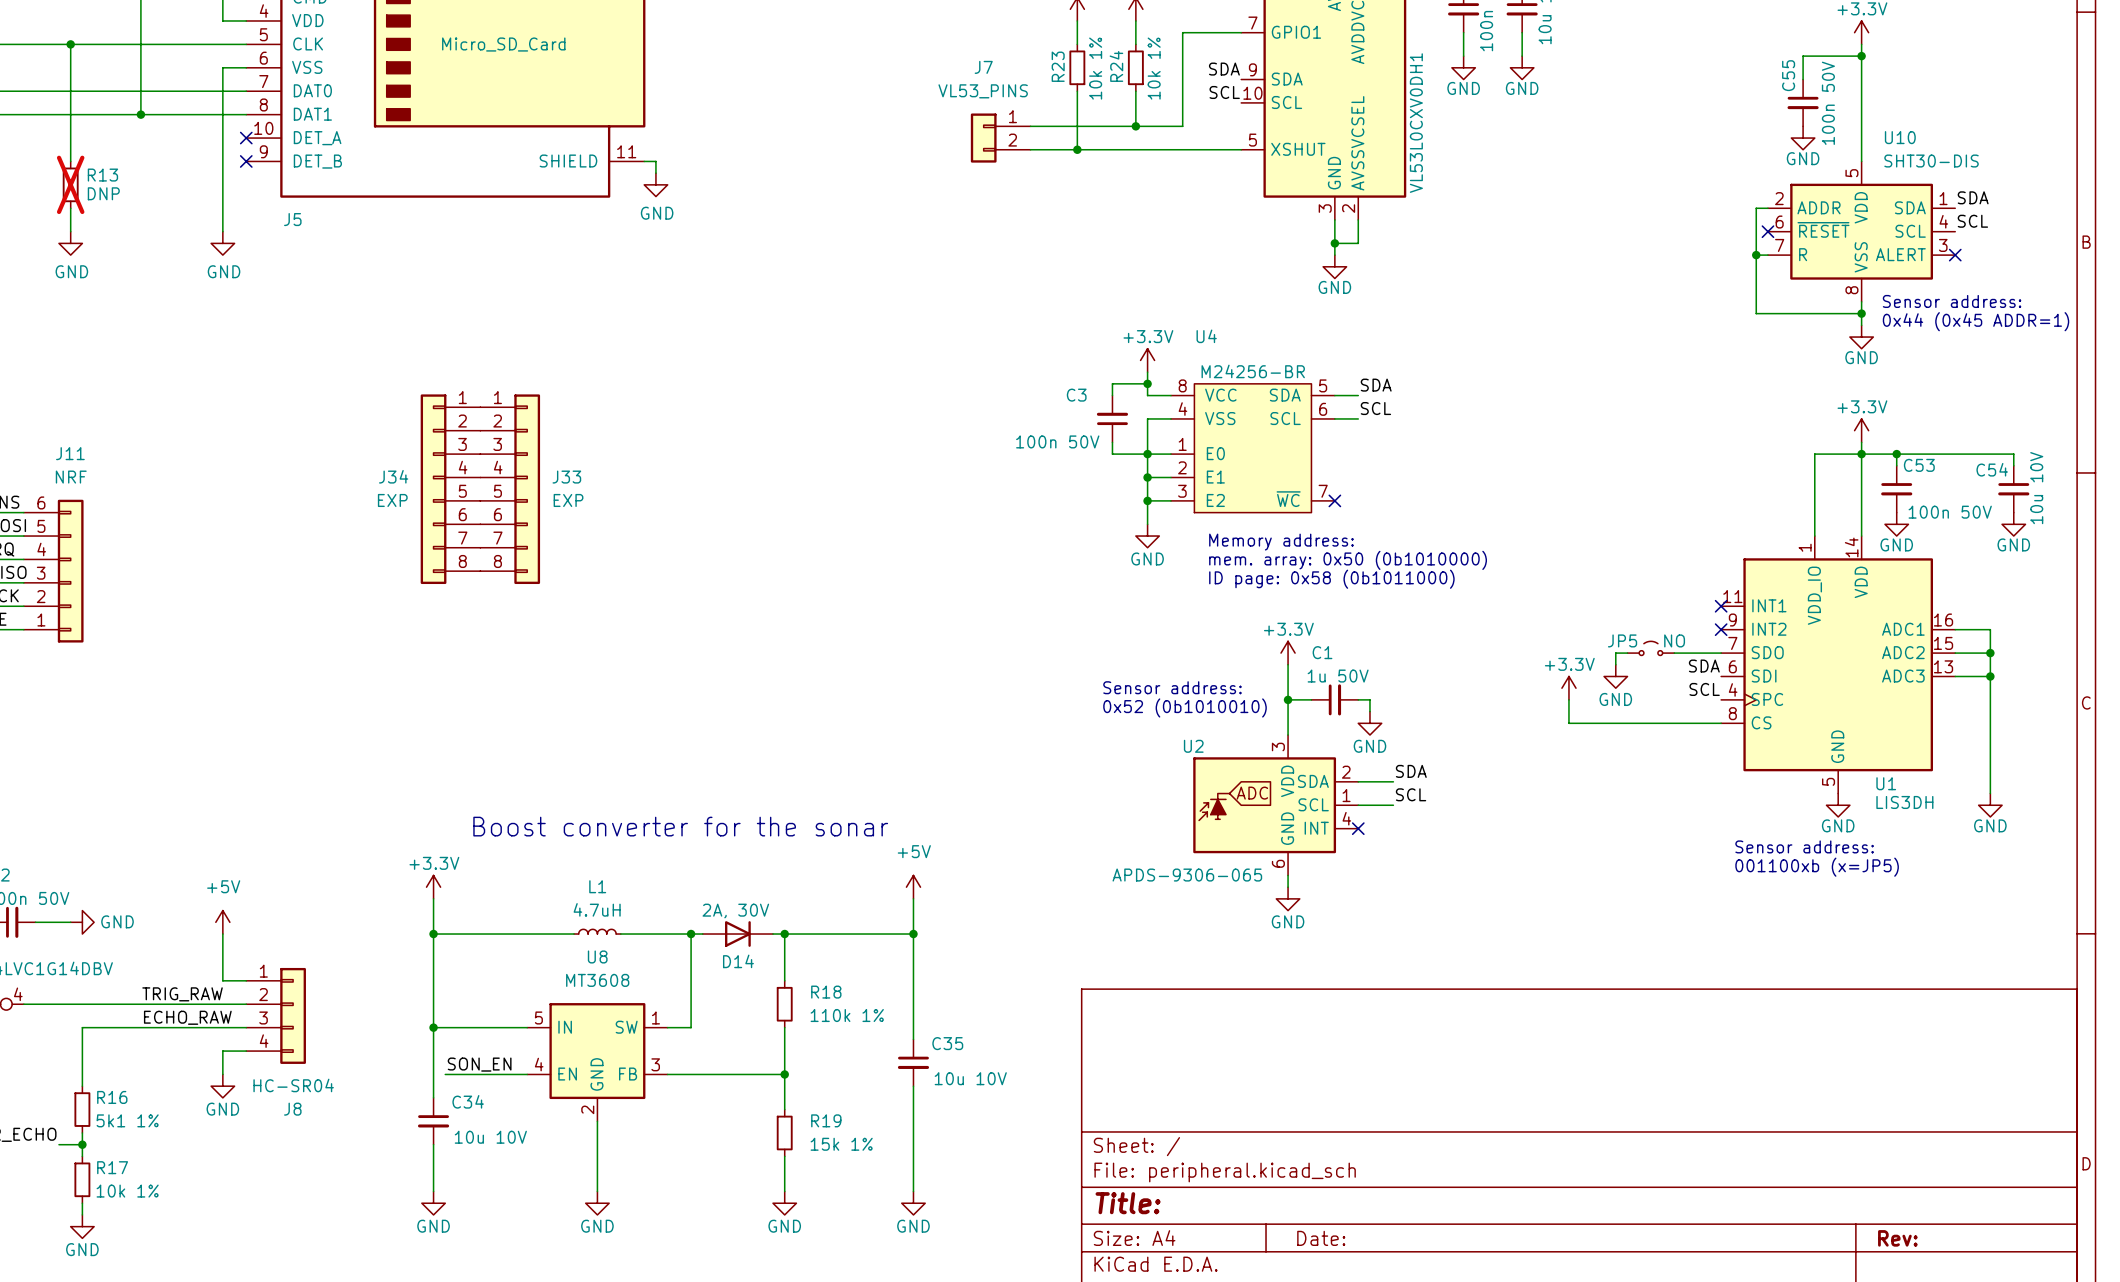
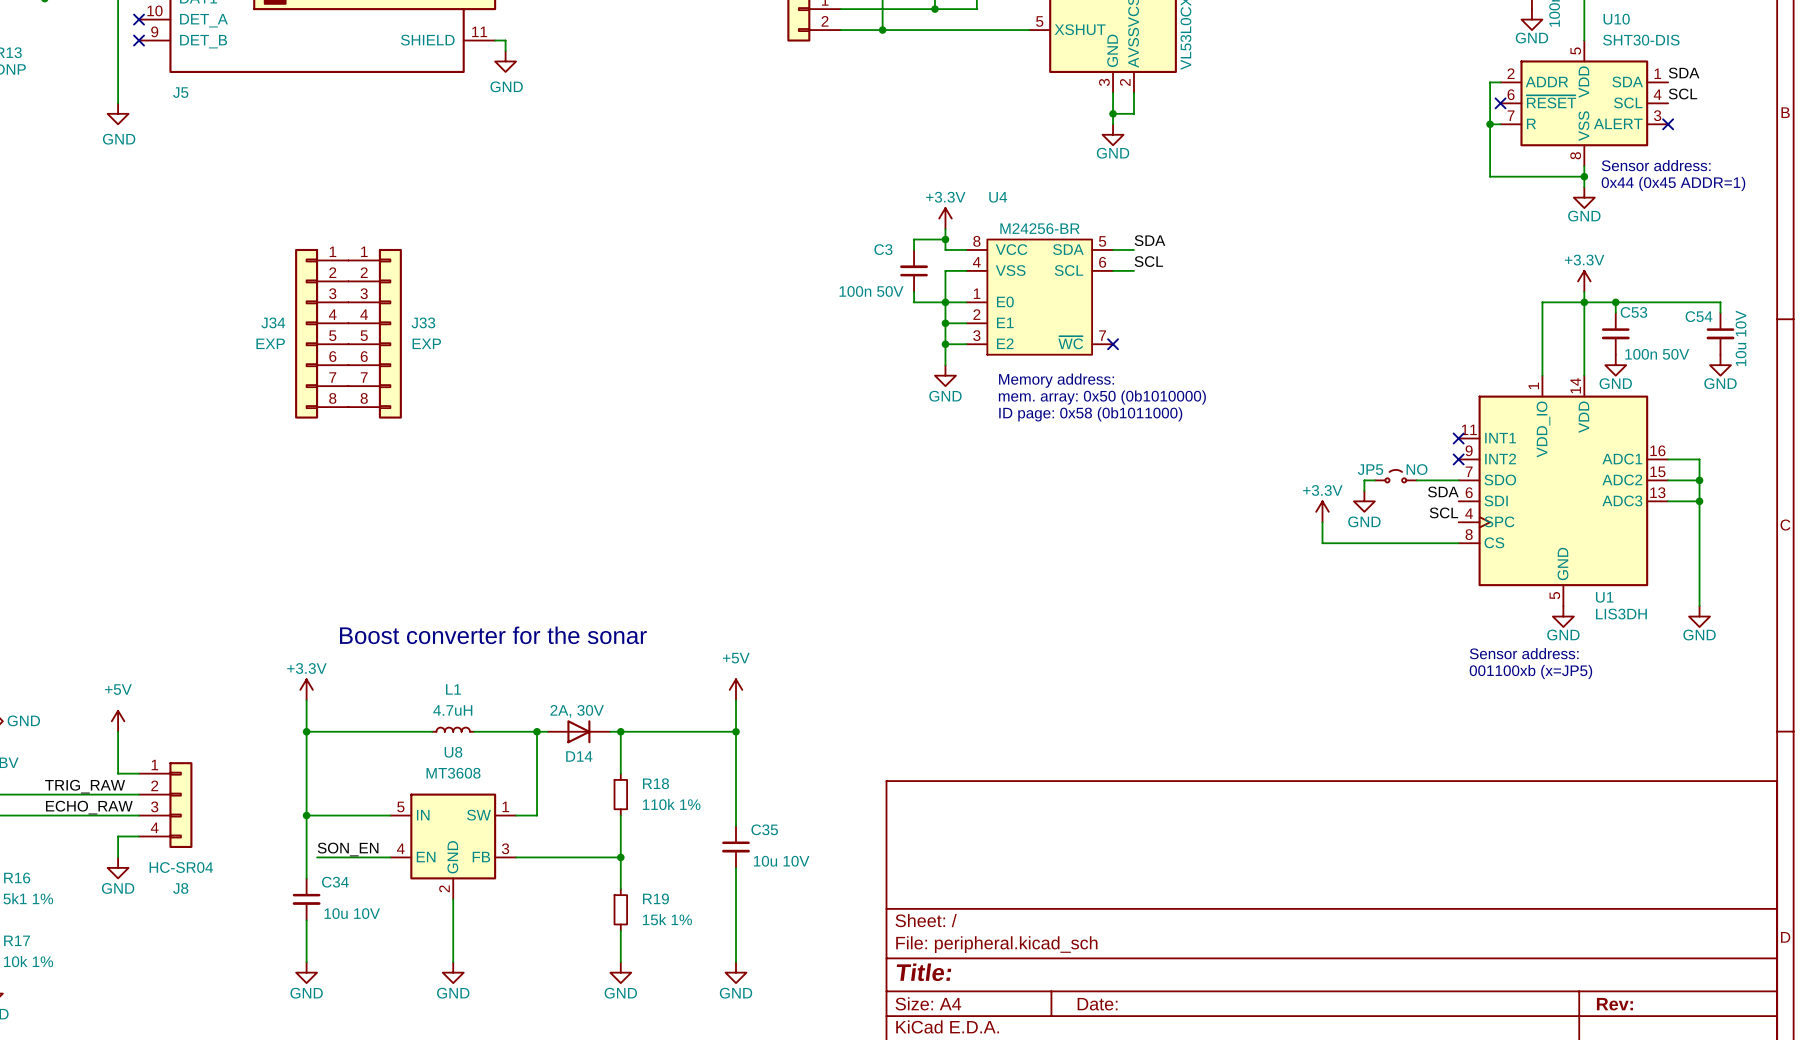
power symbol: +3.3V (1288, 653) -> none
wire: (1288, 664) (1288, 735) -> none
text: Sensor address: (1172, 687) -> none
wire: (1288, 699) (1311, 699) -> none
junction: (1288, 699) -> none
C1: 1u 50V (1334, 699) -> none
wire: (1358, 699) (1369, 699) (1369, 711) -> none
text: 0x52 (0b1010010) (1185, 707) -> none
power symbol: GND (1369, 723) -> none
label: SDA (1411, 771) -> none
wire: (1358, 781) (1393, 781) -> none
label: SCL (1411, 794) -> none
U2: APDS-9306-065 (1275, 805) -> none
wire: (1358, 805) (1393, 805) -> none
no-connect mark: (1358, 828) -> none
wire: (1288, 875) (1288, 887) -> none
power symbol: GND (1288, 898) -> none

